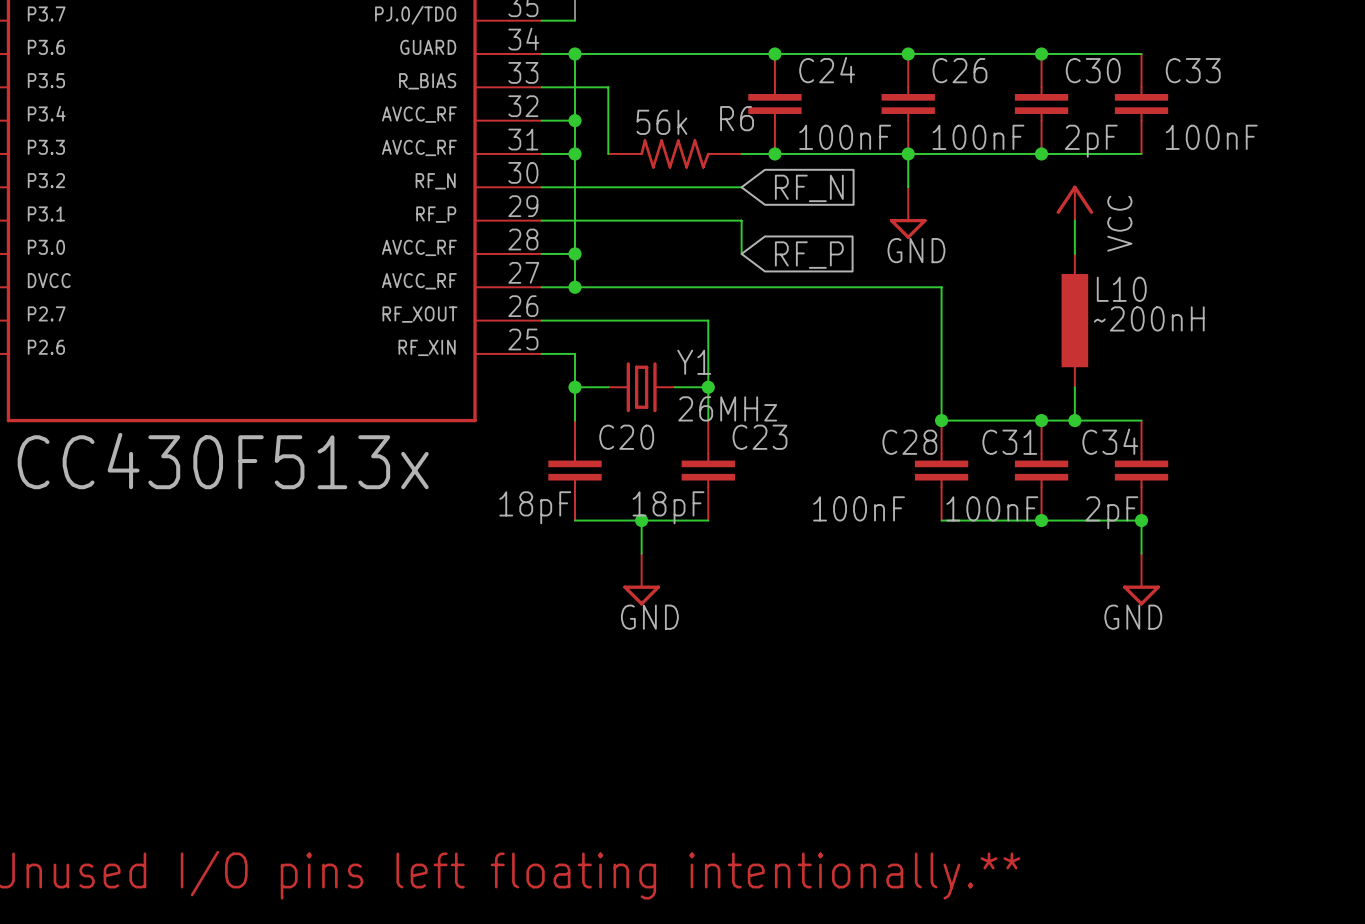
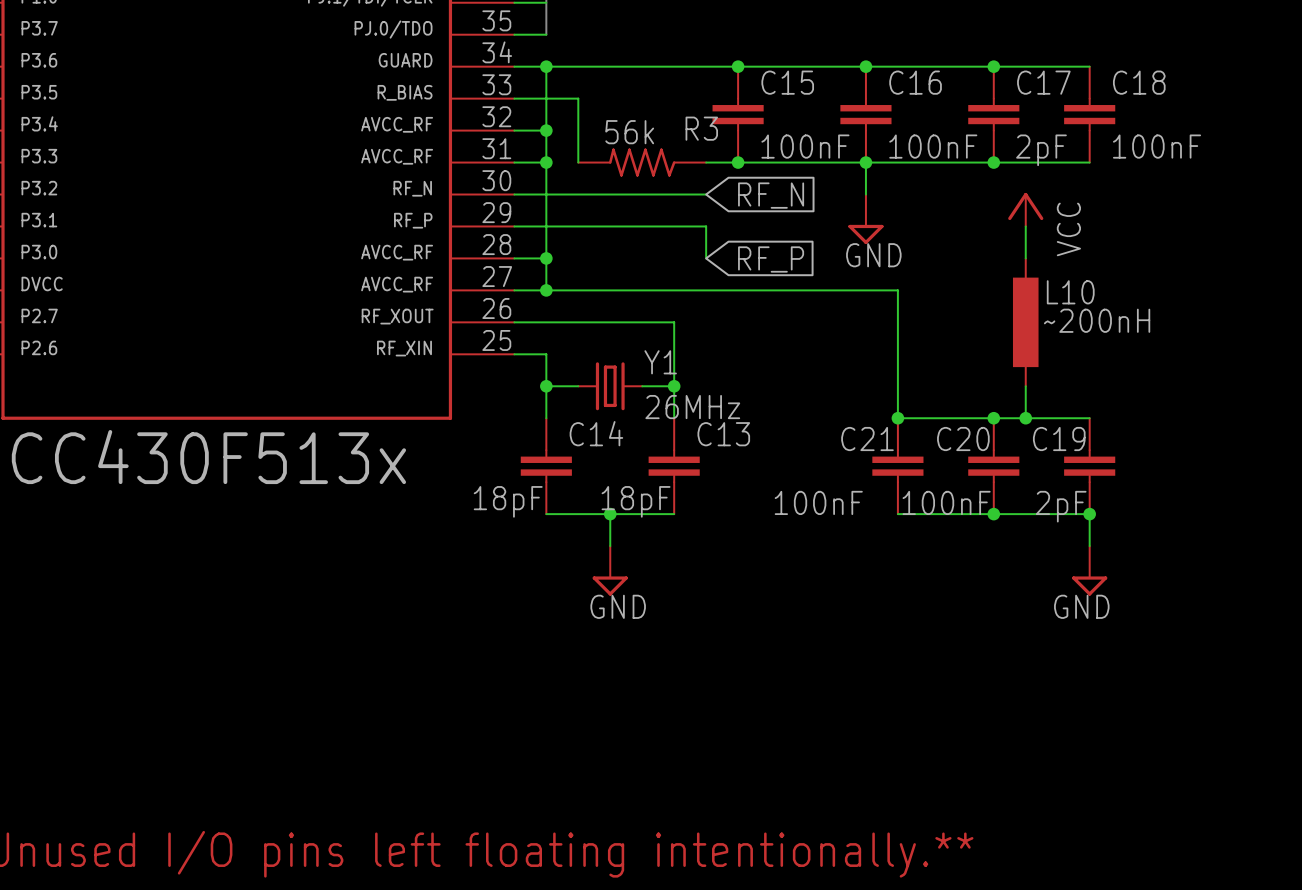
C24 name: C24 (827, 70) -> C15 (787, 82)
C26 name: C26 (959, 70) -> C16 (915, 82)
C30 name: C30 (1093, 70) -> C17 (1043, 82)
C33 name: C33 (1193, 70) -> C18 (1139, 82)
R6 name: R6 (737, 118) -> R3 (701, 128)
C20 name: C20 (626, 437) -> C14 (596, 433)
C23 name: C23 (760, 437) -> C13 (723, 434)
C34 name: C34 (1110, 441) -> C19 (1059, 439)
C28 name: C28 (909, 442) -> C21 (867, 439)
C31 name: C31 (1009, 442) -> C20 (963, 439)

